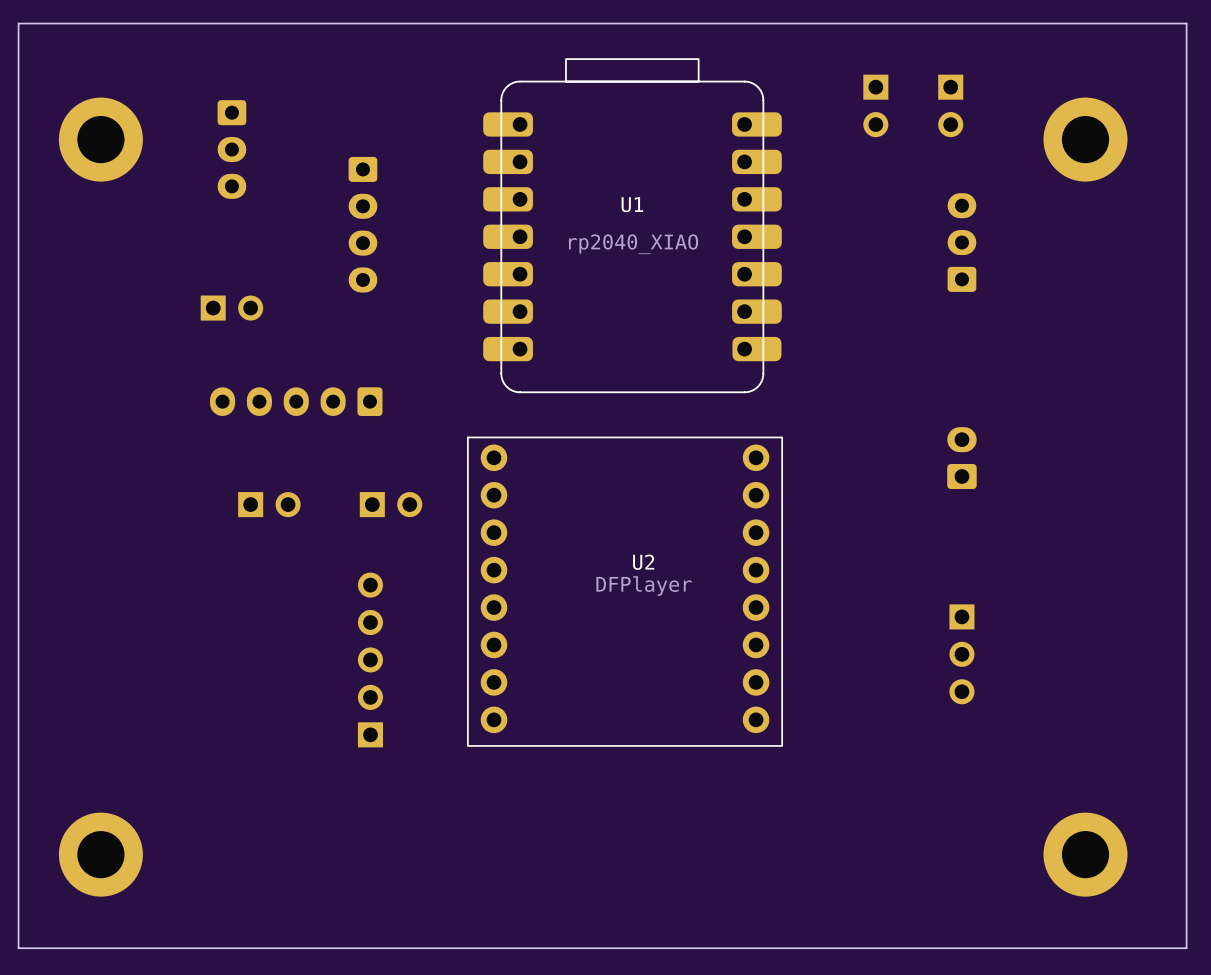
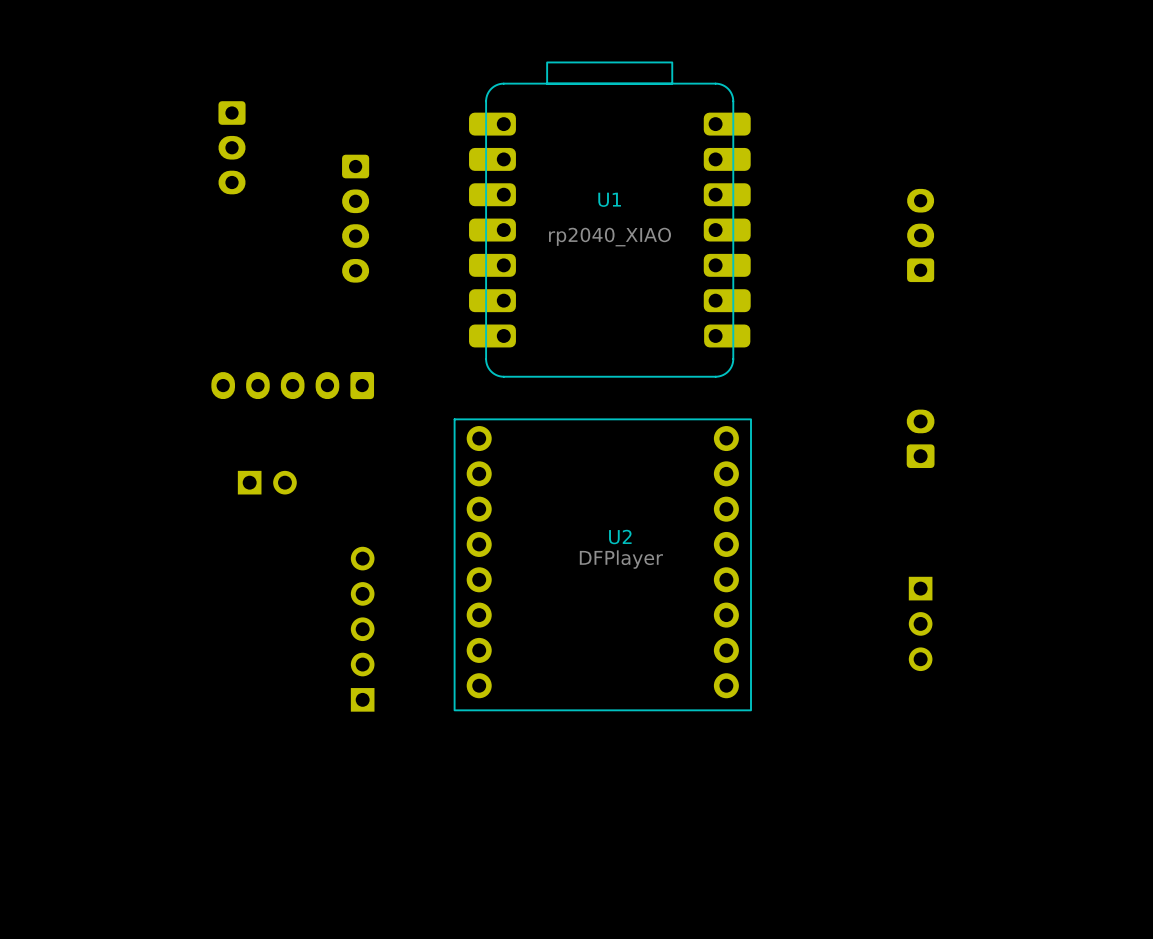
board edge: (1186, 23) (18, 23) (18, 948) (1186, 948) (1186, 23) -> none
part: (875, 105) -> none
part: (950, 105) -> none
part: (100, 139) -> none
part: (1085, 139) -> none
part: (231, 308) -> none
part: (391, 504) -> none
part: (100, 854) -> none
part: (1085, 854) -> none

